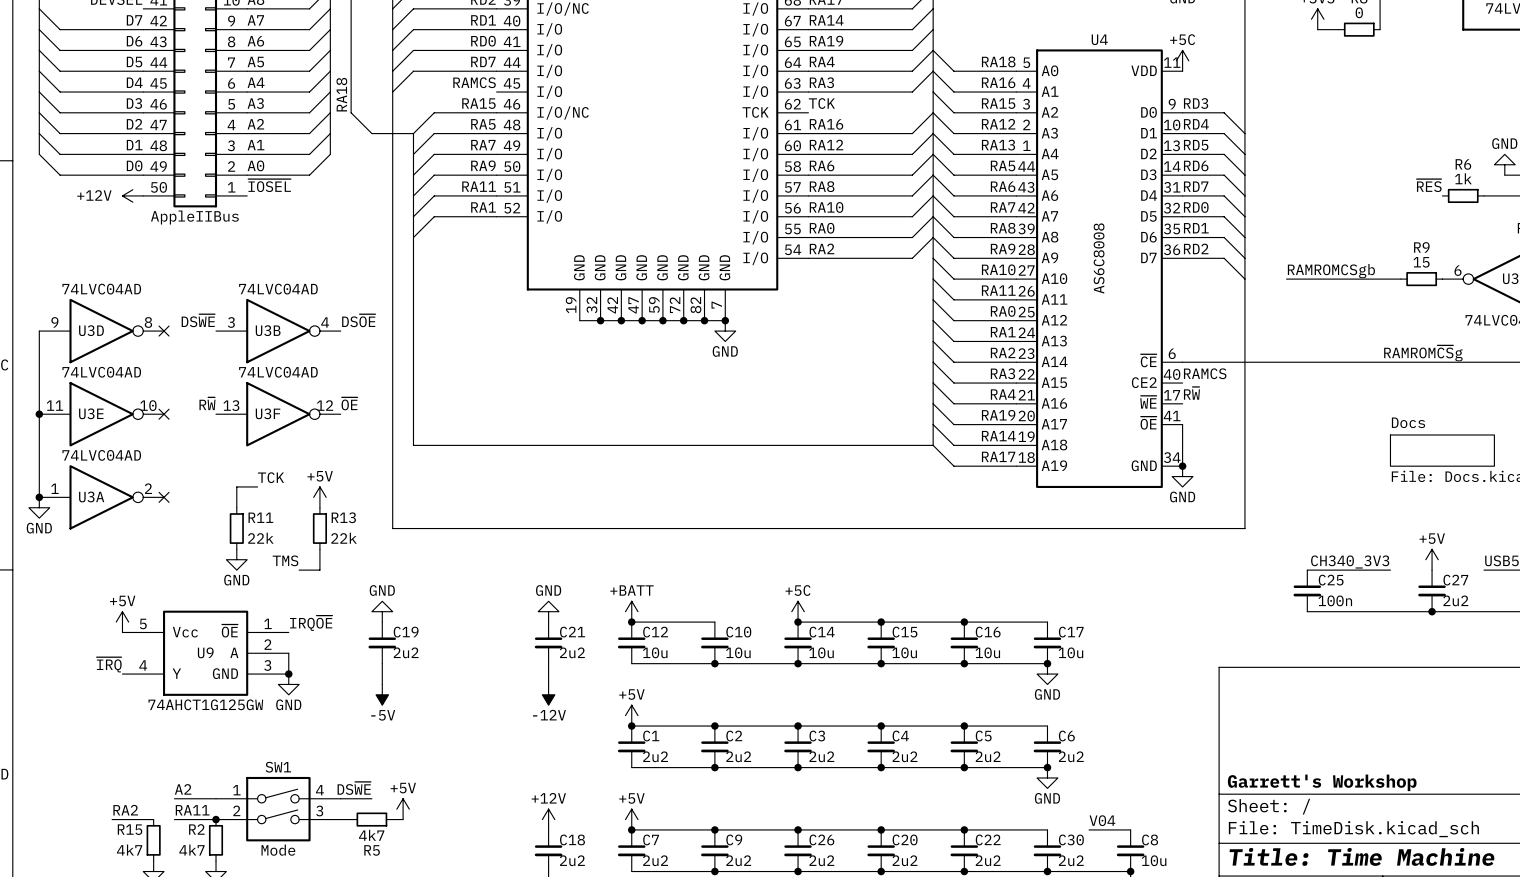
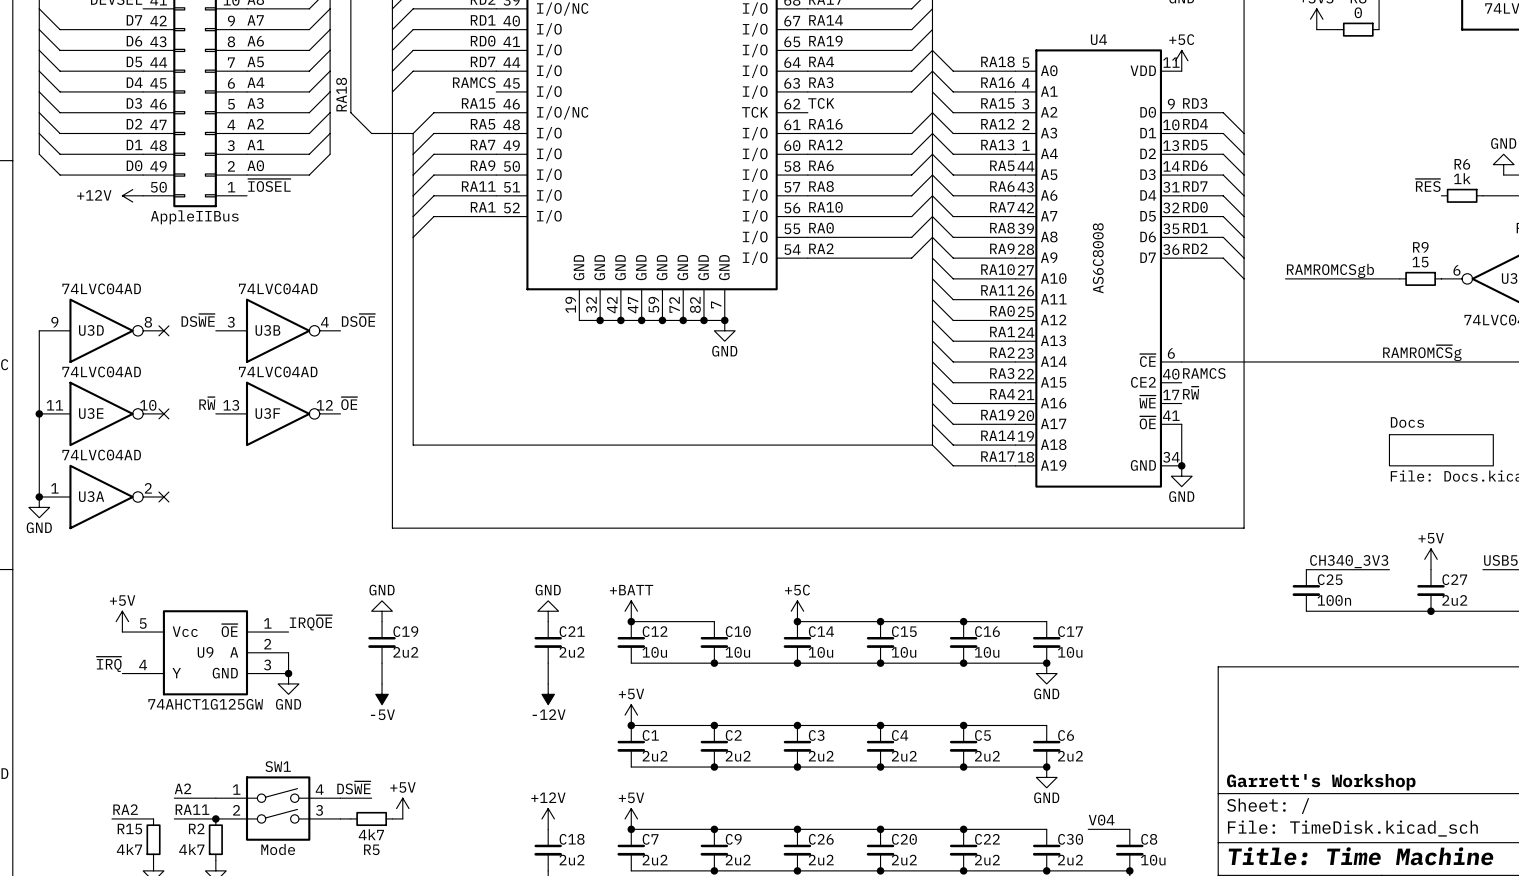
label: TCK (271, 477) -> none
wire: (257, 486) (236, 486) (236, 507) -> none
power symbol: +5V (319, 497) -> none
R11: 22k (236, 528) -> none
R13: 22k (319, 528) -> none
wire: (319, 549) (319, 570) (299, 570) -> none
power symbol: GND (236, 559) -> none
label: TMS (285, 560) -> none

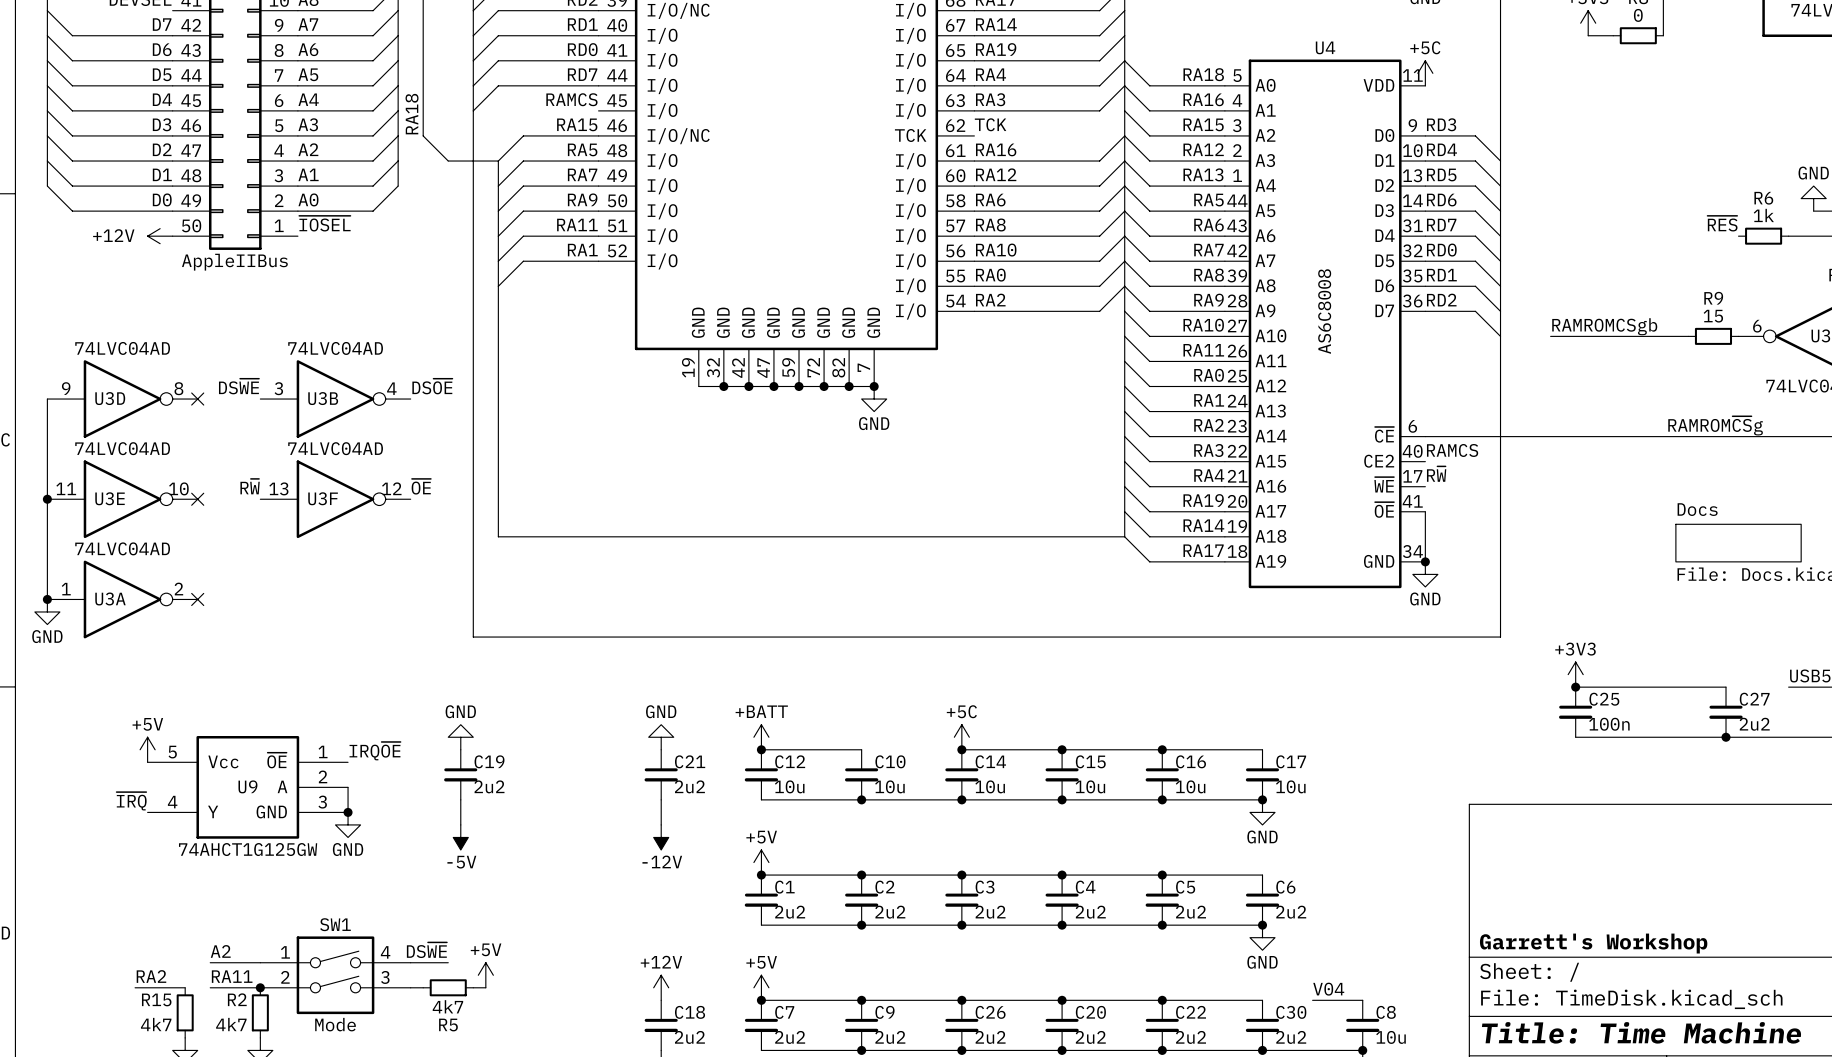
power symbol: none -> +3V3 (1575, 674)
power symbol: +5V (1430, 559) -> none
label: CH340_3V3 (1349, 561) -> none
junction: none -> (1575, 687)
wire: none -> (1675, 687) (1726, 687)

